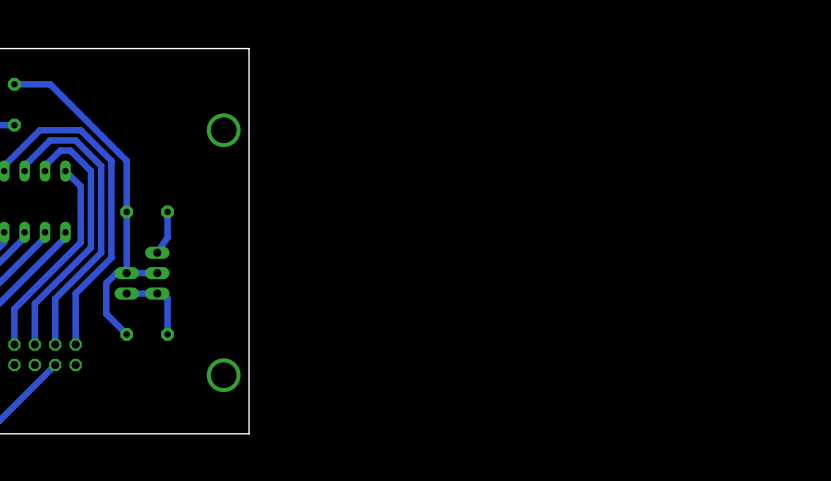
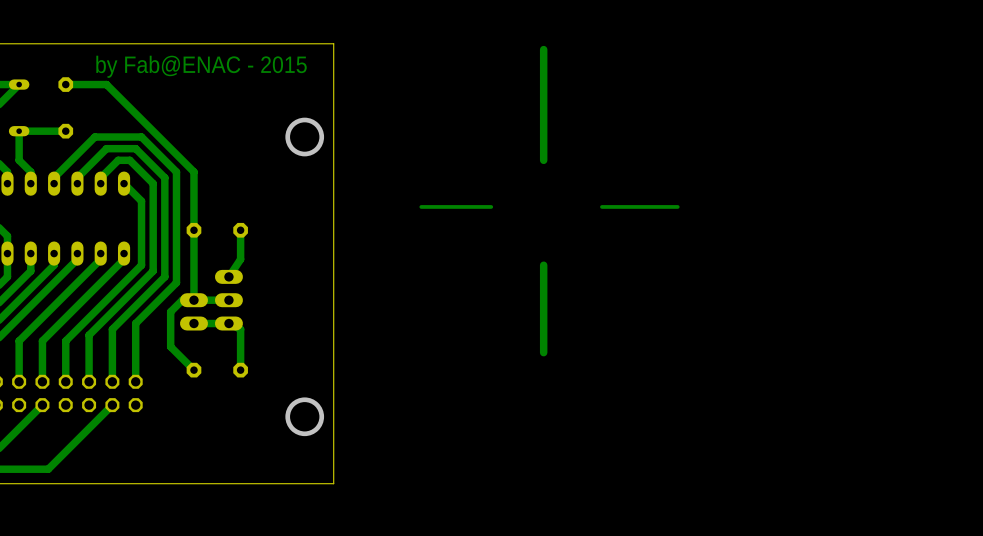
track: none -> (543, 49) (543, 160)
text: none -> by Fab@ENAC - 2015 (201, 66)
track: none -> (491, 206) (421, 206)
track: none -> (677, 206) (601, 206)
track: none -> (543, 265) (543, 352)

